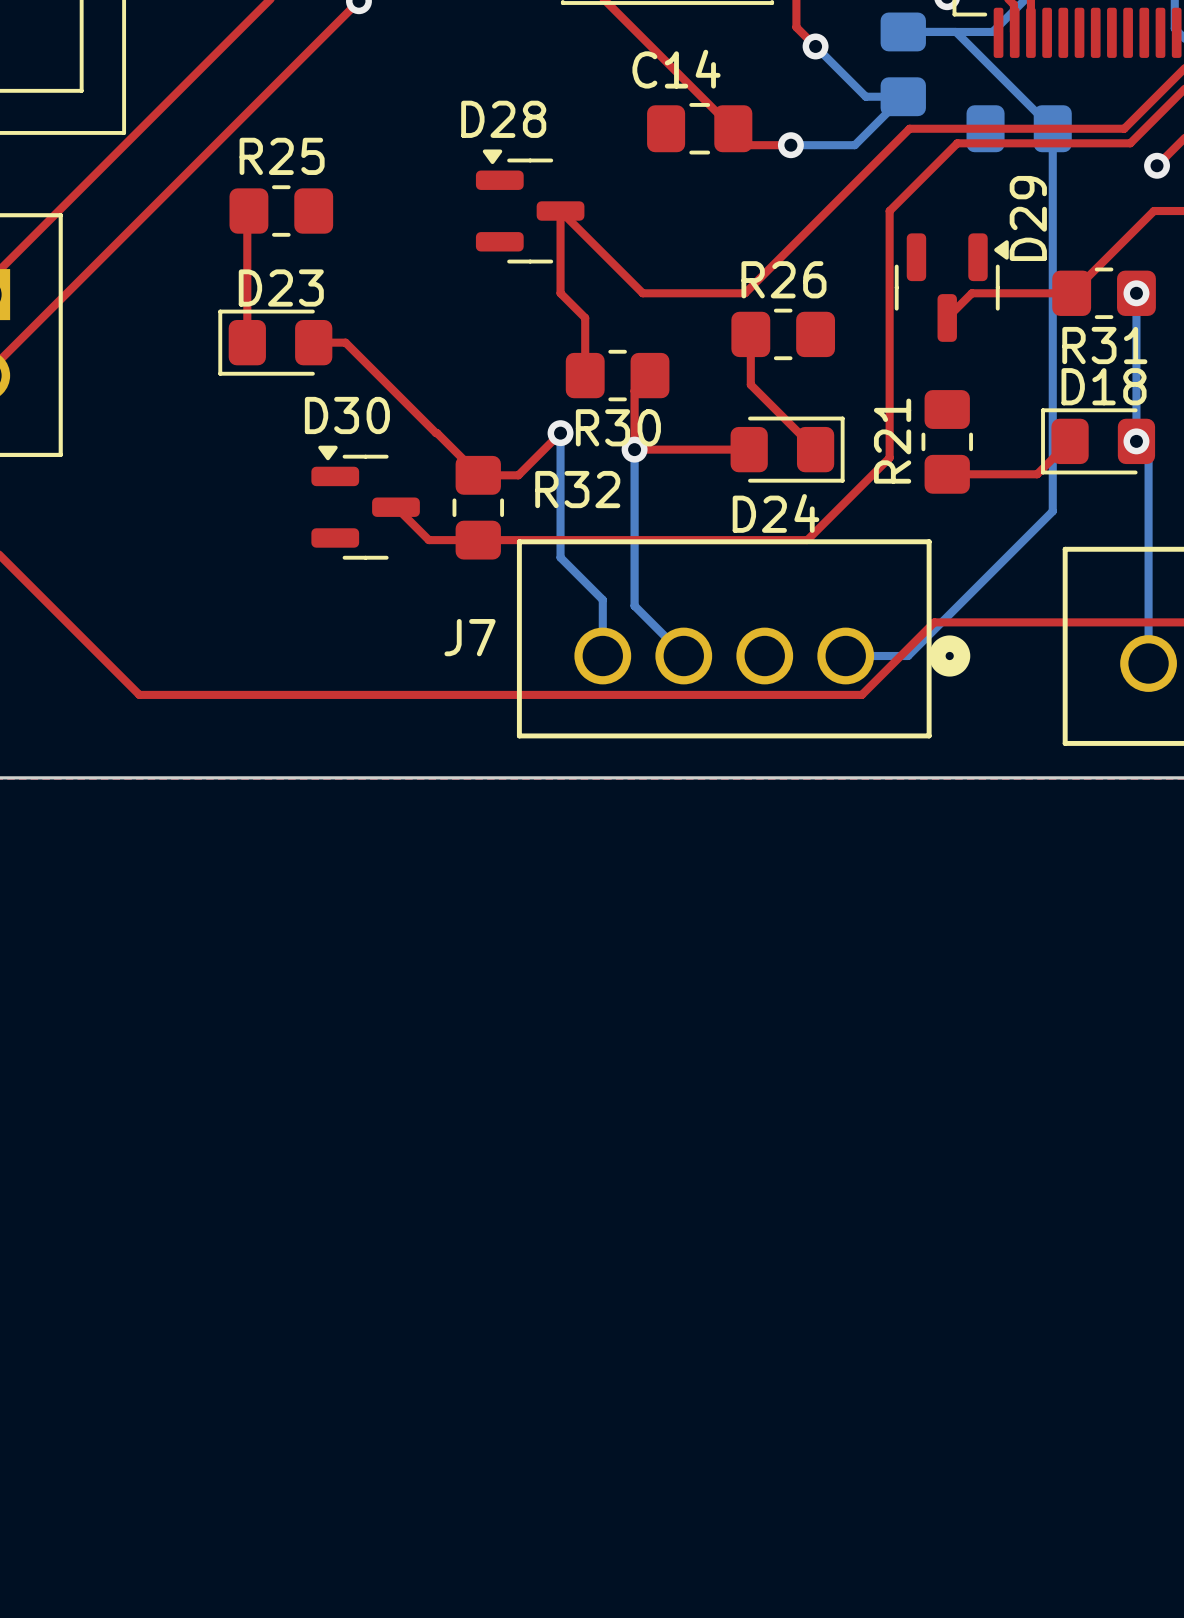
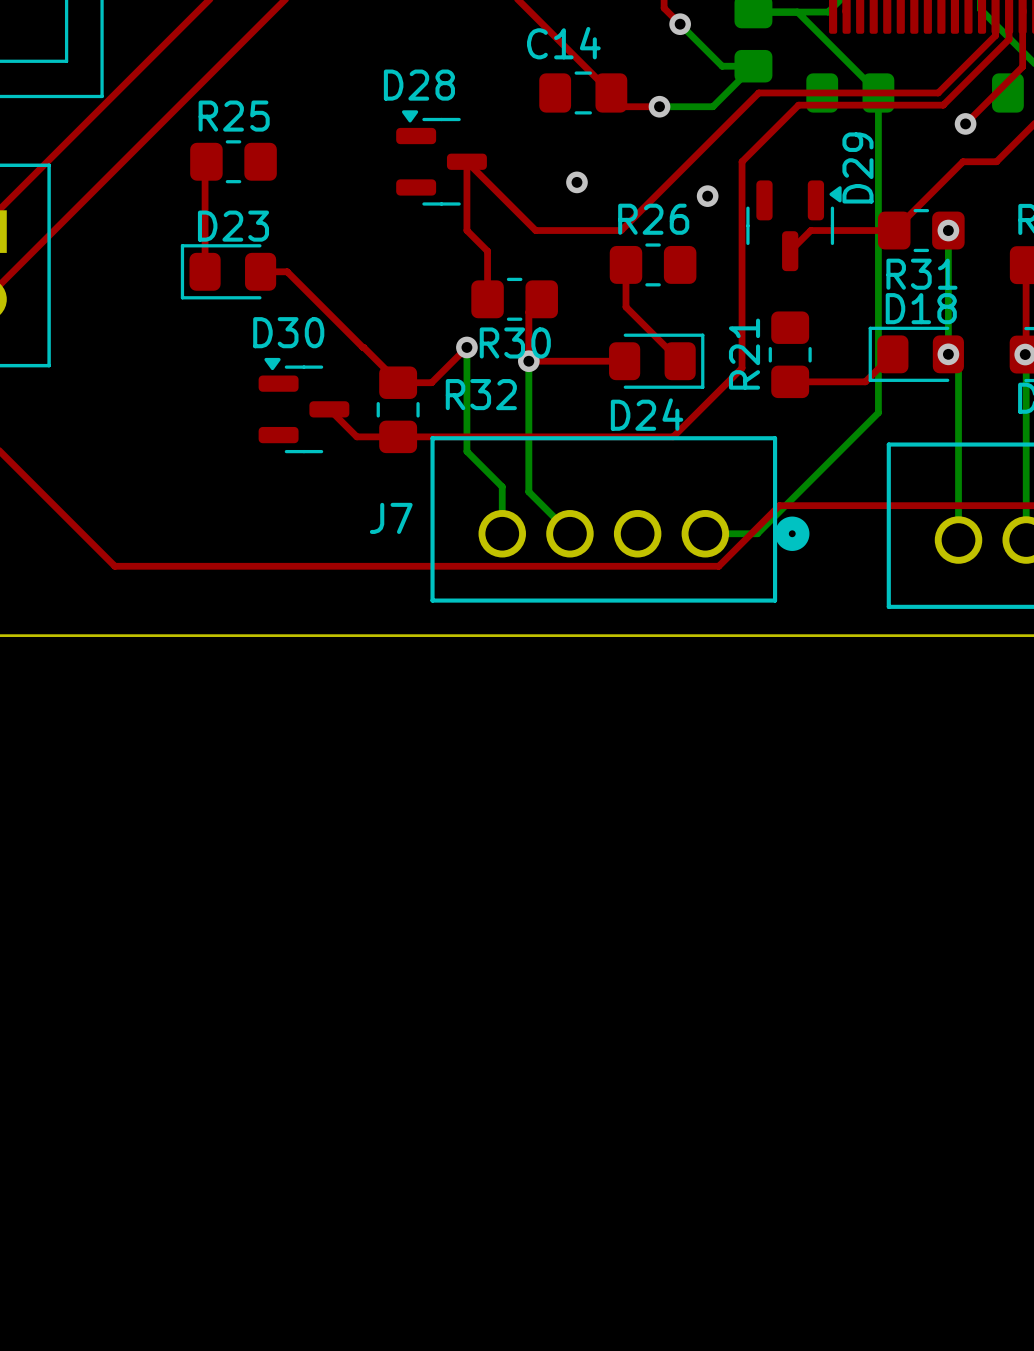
via: none -> (576, 182)
via: none -> (707, 196)

